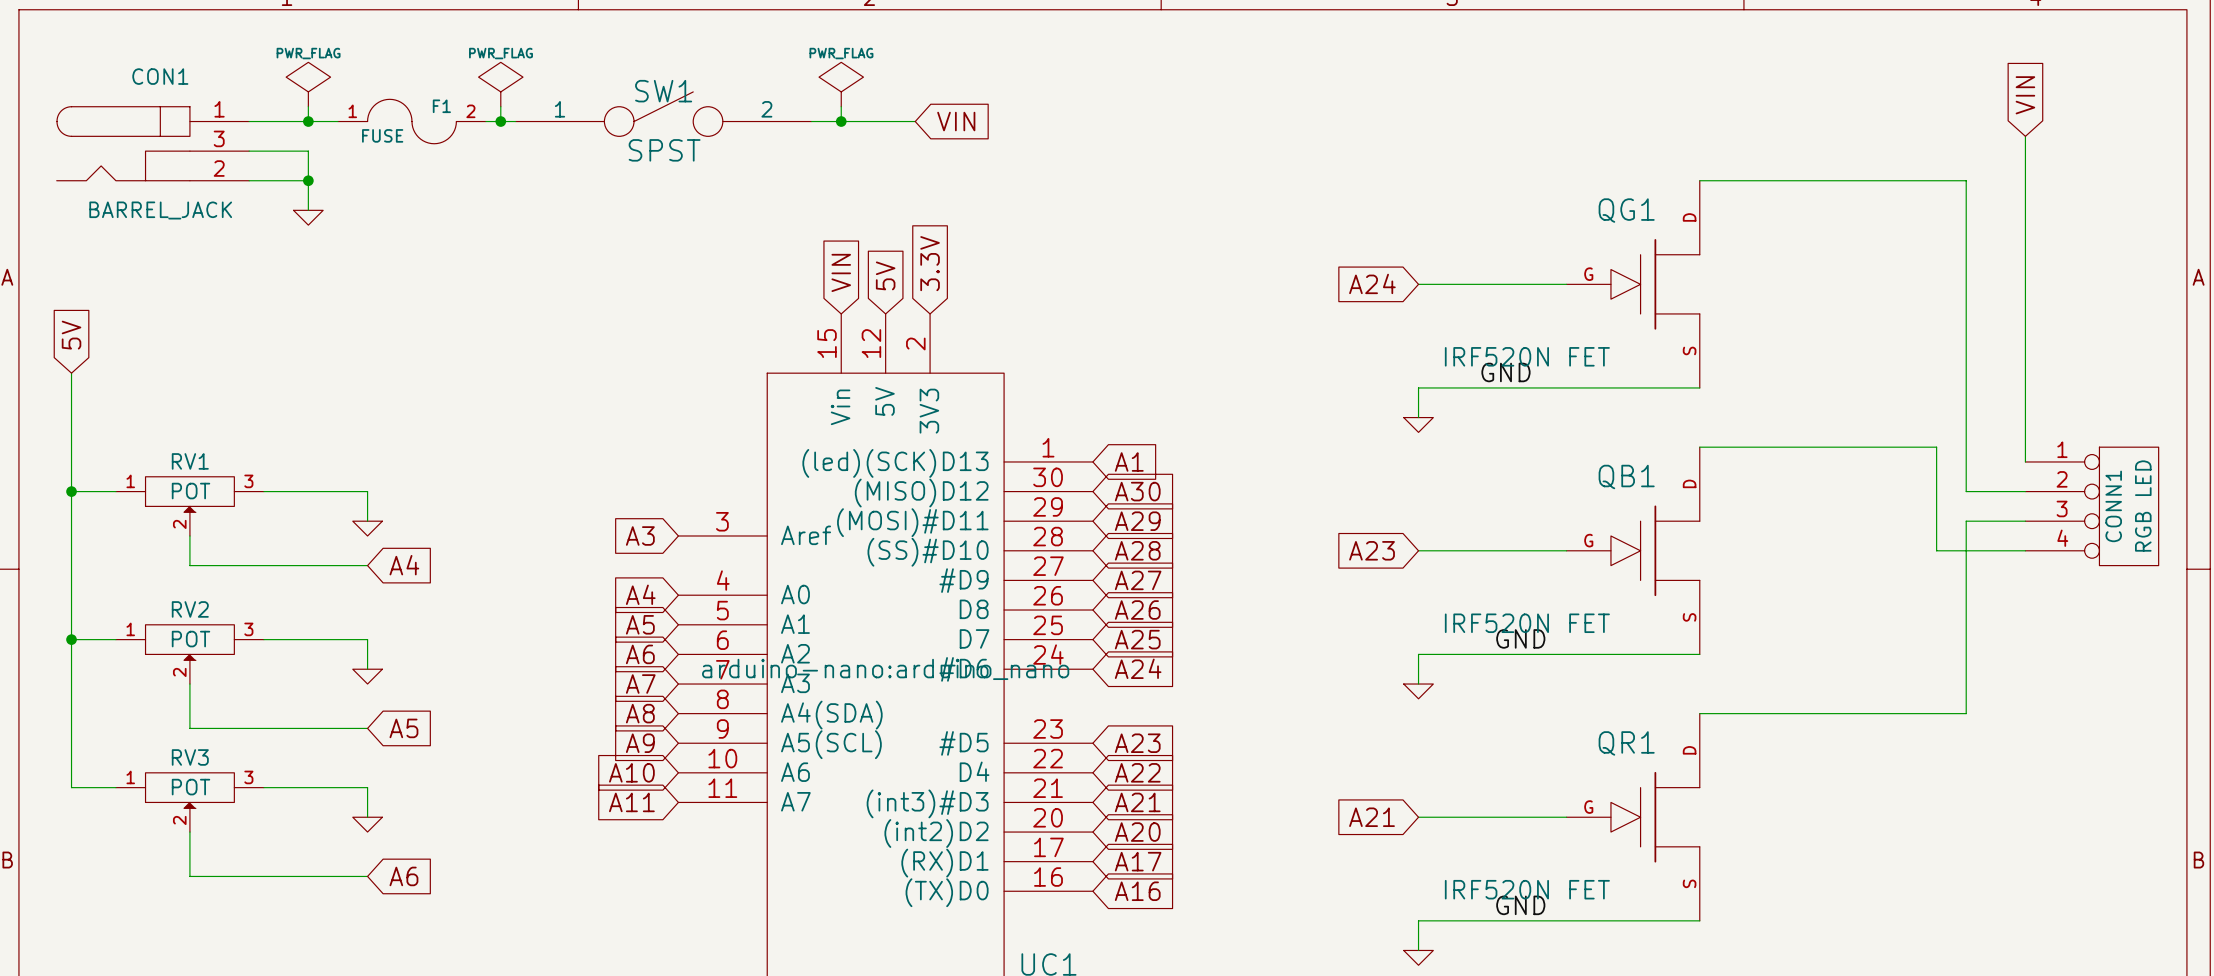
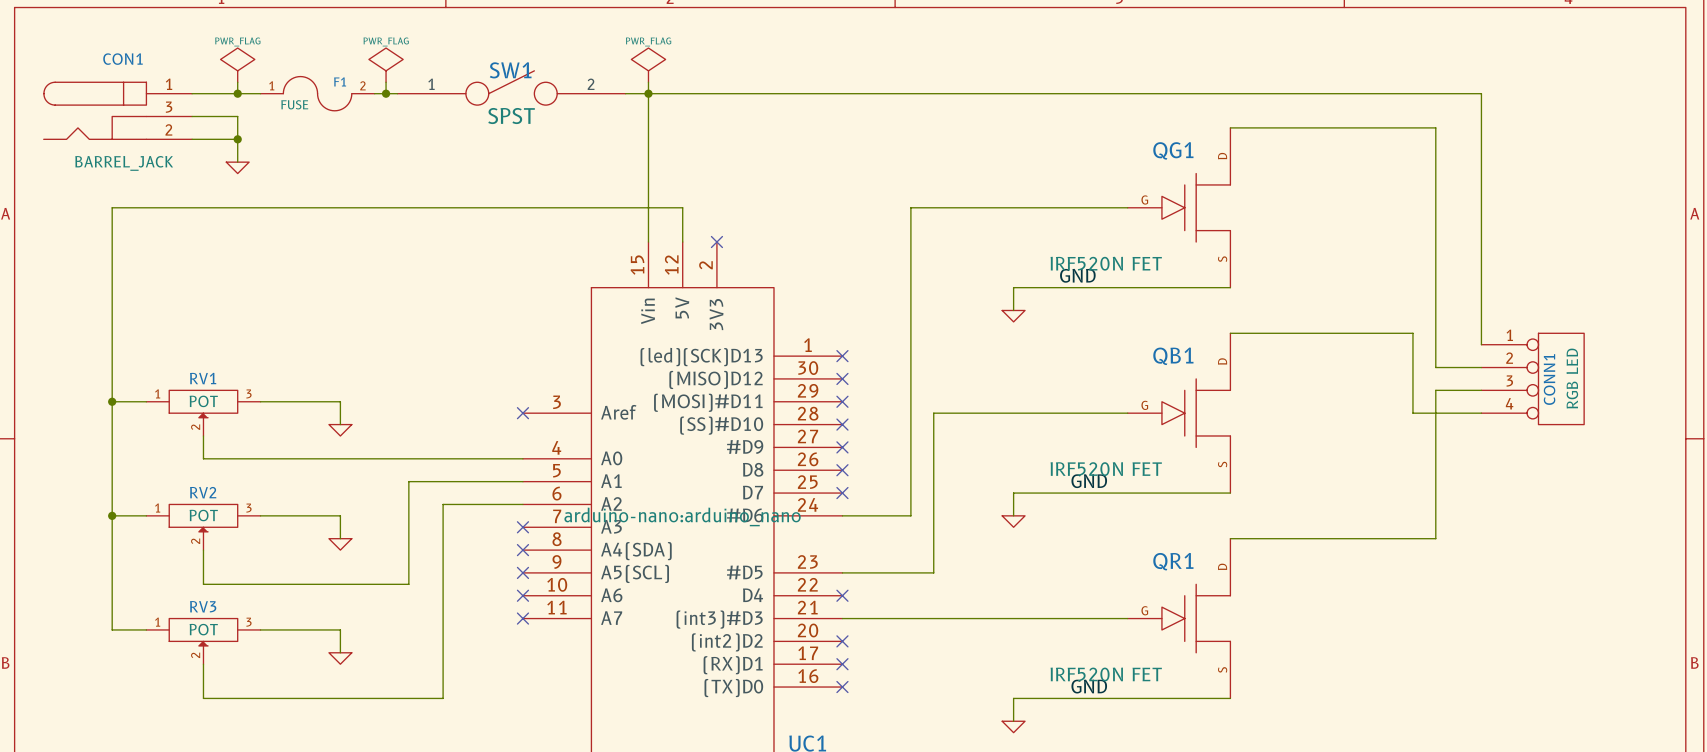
global label: VIN (2025, 95) -> none
wire: none -> (648, 93) (648, 242)
wire: none -> (705, 93) (1481, 93) (1481, 344)
global label: VIN (956, 121) -> none
wire: (2025, 136) (2025, 461) -> none
wire: (1699, 180) (1966, 180) (1966, 491) (2025, 491) -> (1230, 127) (1435, 127) (1435, 367) (1481, 367)
global label: 3.3V (930, 263) -> none
wire: none -> (1127, 207) (910, 207) (910, 515) (842, 515)
global label: VIN (841, 272) -> none
global label: 5V (885, 275) -> none
global label: A24 (1372, 283) -> none
wire: (1418, 284) (1566, 284) -> none
QG1 position: (1633, 284) -> (1179, 207)
wire: none -> (682, 242) (682, 207) (112, 207) (112, 629) (146, 629)
no-connect mark: none -> (716, 242)
global label: 5V (71, 335) -> none
label position: GND (1505, 372) -> GND (1077, 275)
wire: (71, 373) (71, 787) (115, 787) -> none
wire: (1699, 387) (1418, 387) (1418, 417) -> (1230, 287) (1013, 287) (1013, 310)
power symbol position: (1418, 424) -> (1013, 316)
wire: (1699, 447) (1936, 447) (1936, 550) (2025, 550) -> (1230, 333) (1412, 333) (1412, 413) (1481, 413)
no-connect mark: none -> (842, 356)
global label: A1 (1129, 461) -> none
wire: (71, 491) (115, 491) -> (112, 401) (146, 401)
junction: (71, 491) -> none
wire: (263, 491) (367, 491) (367, 521) -> (260, 401) (340, 401) (340, 424)
no-connect mark: none -> (842, 378)
global label: A30 (1137, 491) -> none
RV1 position: (189, 506) -> (203, 413)
CONN1 position: (2092, 506) -> (1532, 378)
junction: none -> (112, 401)
no-connect mark: none -> (842, 401)
global label: A29 (1137, 521) -> none
wire: (2025, 521) (1966, 521) (1966, 713) (1699, 713) -> (1481, 390) (1435, 390) (1435, 538) (1230, 538)
power symbol: (367, 528) -> none
wire: (189, 535) (189, 565) (367, 565) -> none
global label: A3 (640, 535) -> none
no-connect mark: none -> (522, 413)
wire: none -> (1127, 413) (933, 413) (933, 572) (842, 572)
no-connect mark: none -> (842, 424)
global label: A28 (1137, 550) -> none
global label: A23 (1372, 550) -> none
wire: (1418, 550) (1566, 550) -> none
QB1 position: (1633, 550) -> (1179, 413)
power symbol: none -> (340, 430)
wire: none -> (203, 435) (203, 458) (522, 458)
global label: A4 (404, 565) -> none
no-connect mark: none -> (842, 447)
global label: A27 (1138, 580) -> none
global label: A4 (640, 594) -> none
no-connect mark: none -> (842, 470)
global label: A26 (1137, 610) -> none
global label: A5 (640, 624) -> none
wire: none -> (522, 481) (408, 481) (408, 584) (203, 584) (203, 550)
label position: GND (1520, 638) -> GND (1089, 481)
wire: (71, 639) (115, 639) -> (112, 515) (146, 515)
junction: (71, 639) -> none
wire: (263, 639) (367, 639) (367, 669) -> (260, 515) (340, 515) (340, 538)
no-connect mark: none -> (842, 493)
global label: A25 (1137, 639) -> none
RV2 position: (189, 654) -> (203, 527)
global label: A6 (640, 654) -> none
wire: none -> (522, 504) (443, 504) (443, 698) (203, 698) (203, 664)
wire: (1699, 654) (1418, 654) (1418, 684) -> (1230, 493) (1013, 493) (1013, 515)
global label: A24 (1138, 668) -> none
junction: none -> (112, 515)
power symbol: (367, 676) -> none
wire: (189, 684) (189, 728) (367, 728) -> none
global label: A7 (640, 684) -> none
no-connect mark: none -> (522, 527)
power symbol position: (1418, 691) -> (1013, 521)
power symbol: none -> (340, 544)
global label: A8 (640, 713) -> none
no-connect mark: none -> (522, 550)
global label: A5 (403, 728) -> none
global label: A9 (640, 743) -> none
no-connect mark: none -> (522, 572)
global label: A23 (1137, 743) -> none
global label: A10 (631, 772) -> none
no-connect mark: none -> (522, 595)
no-connect mark: none -> (842, 595)
global label: A22 (1137, 772) -> none
wire: (263, 787) (367, 787) (367, 817) -> (260, 629) (340, 629) (340, 652)
RV3 position: (189, 802) -> (203, 641)
global label: A11 (631, 802) -> none
no-connect mark: none -> (522, 618)
wire: none -> (842, 618) (1127, 618)
global label: A21 (1137, 802) -> none
global label: A21 (1372, 817) -> none
wire: (1418, 817) (1566, 817) -> none
QR1 position: (1633, 817) -> (1179, 618)
power symbol: (367, 824) -> none
wire: (189, 832) (189, 876) (367, 876) -> none
no-connect mark: none -> (842, 641)
global label: A20 (1137, 832) -> none
power symbol: none -> (340, 658)
no-connect mark: none -> (842, 664)
global label: A17 (1138, 861) -> none
global label: A6 (403, 876) -> none
no-connect mark: none -> (842, 687)
global label: A16 (1137, 891) -> none
label position: GND (1520, 905) -> GND (1089, 686)
wire: (1699, 920) (1418, 920) (1418, 950) -> (1230, 698) (1013, 698) (1013, 721)
power symbol position: (1418, 957) -> (1013, 726)

